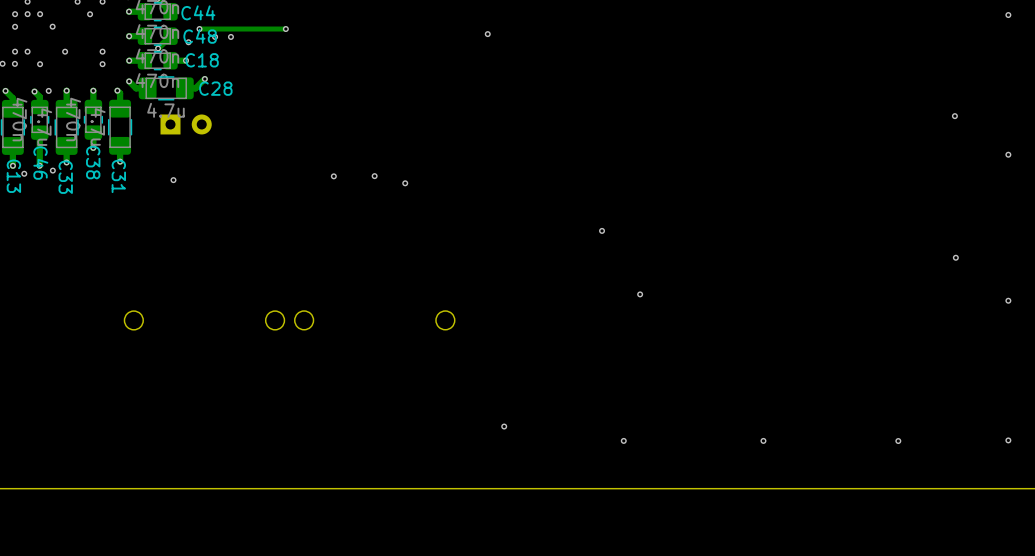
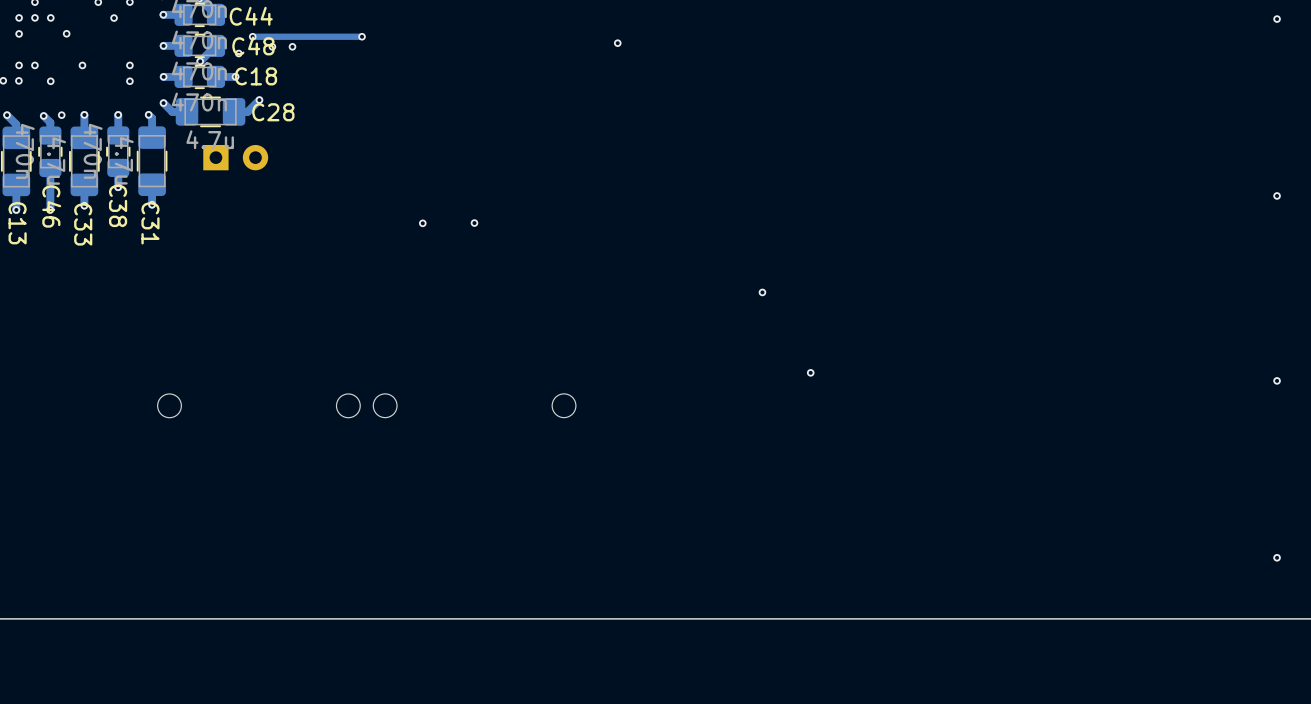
via: (954, 116) -> none
via: (52, 170) -> none
via: (24, 173) -> none
via: (173, 180) -> none
via: (405, 183) -> none
via: (955, 257) -> none
via: (504, 426) -> none
via: (623, 440) -> none
via: (763, 440) -> none
via: (898, 441) -> none

